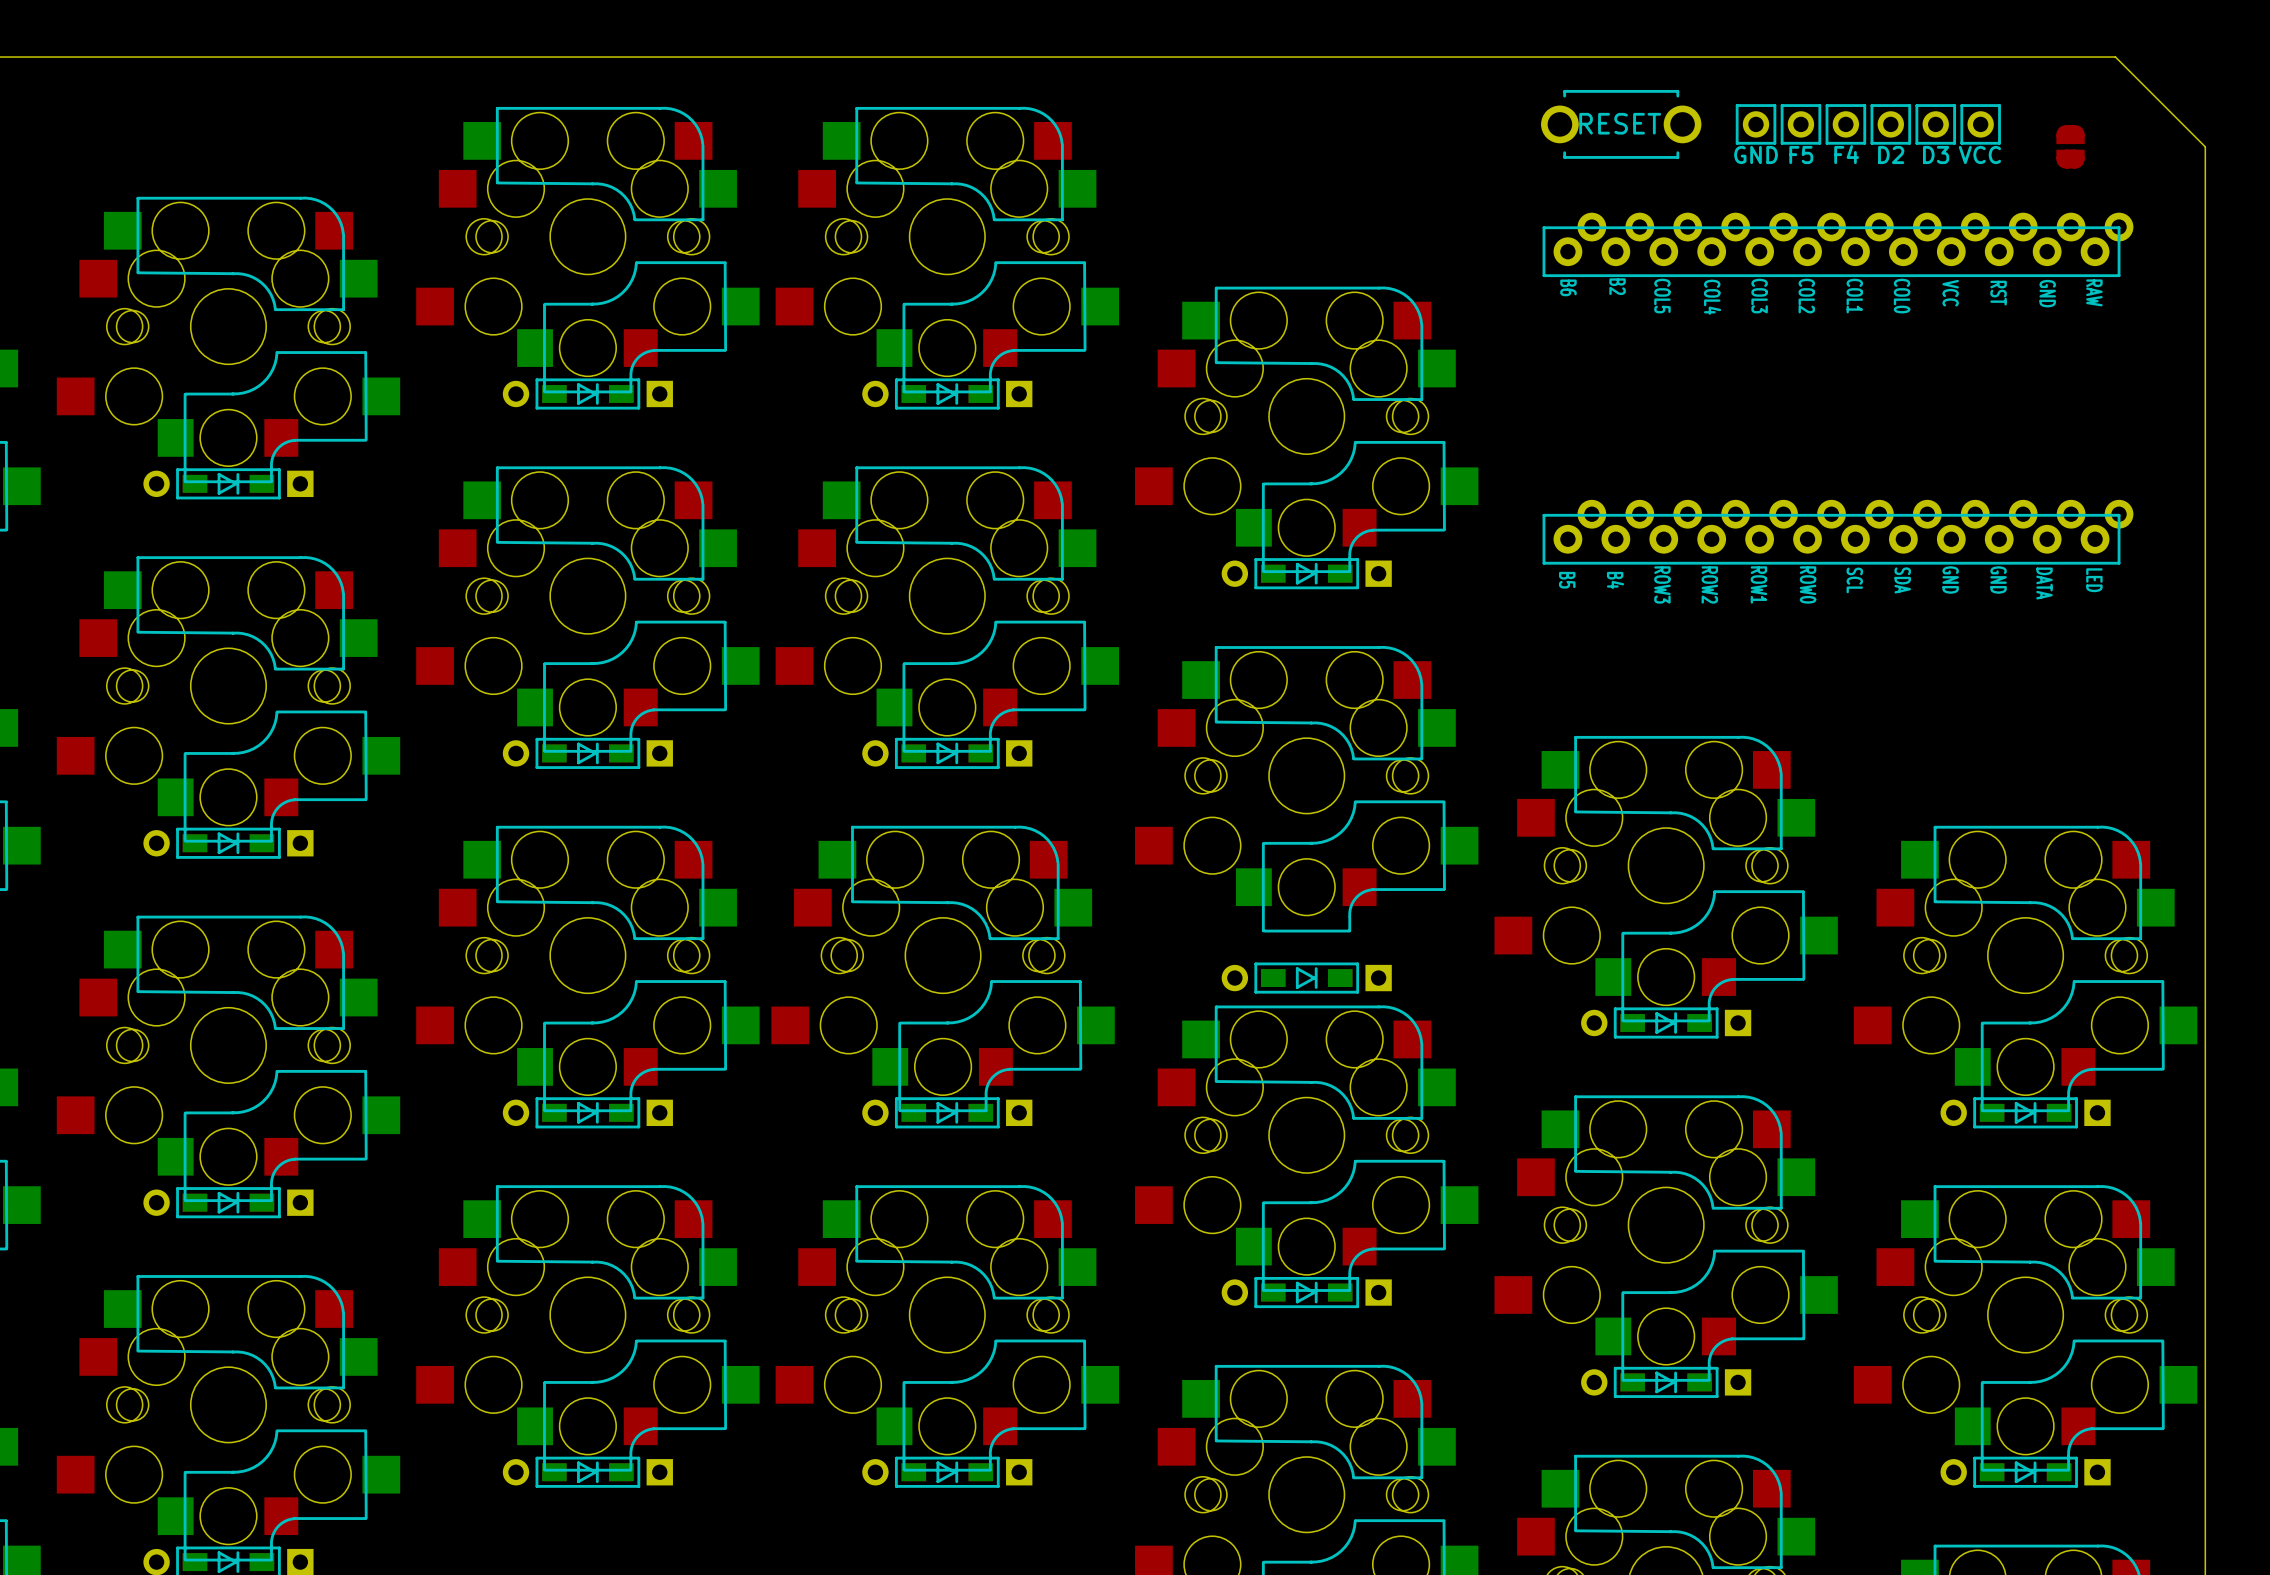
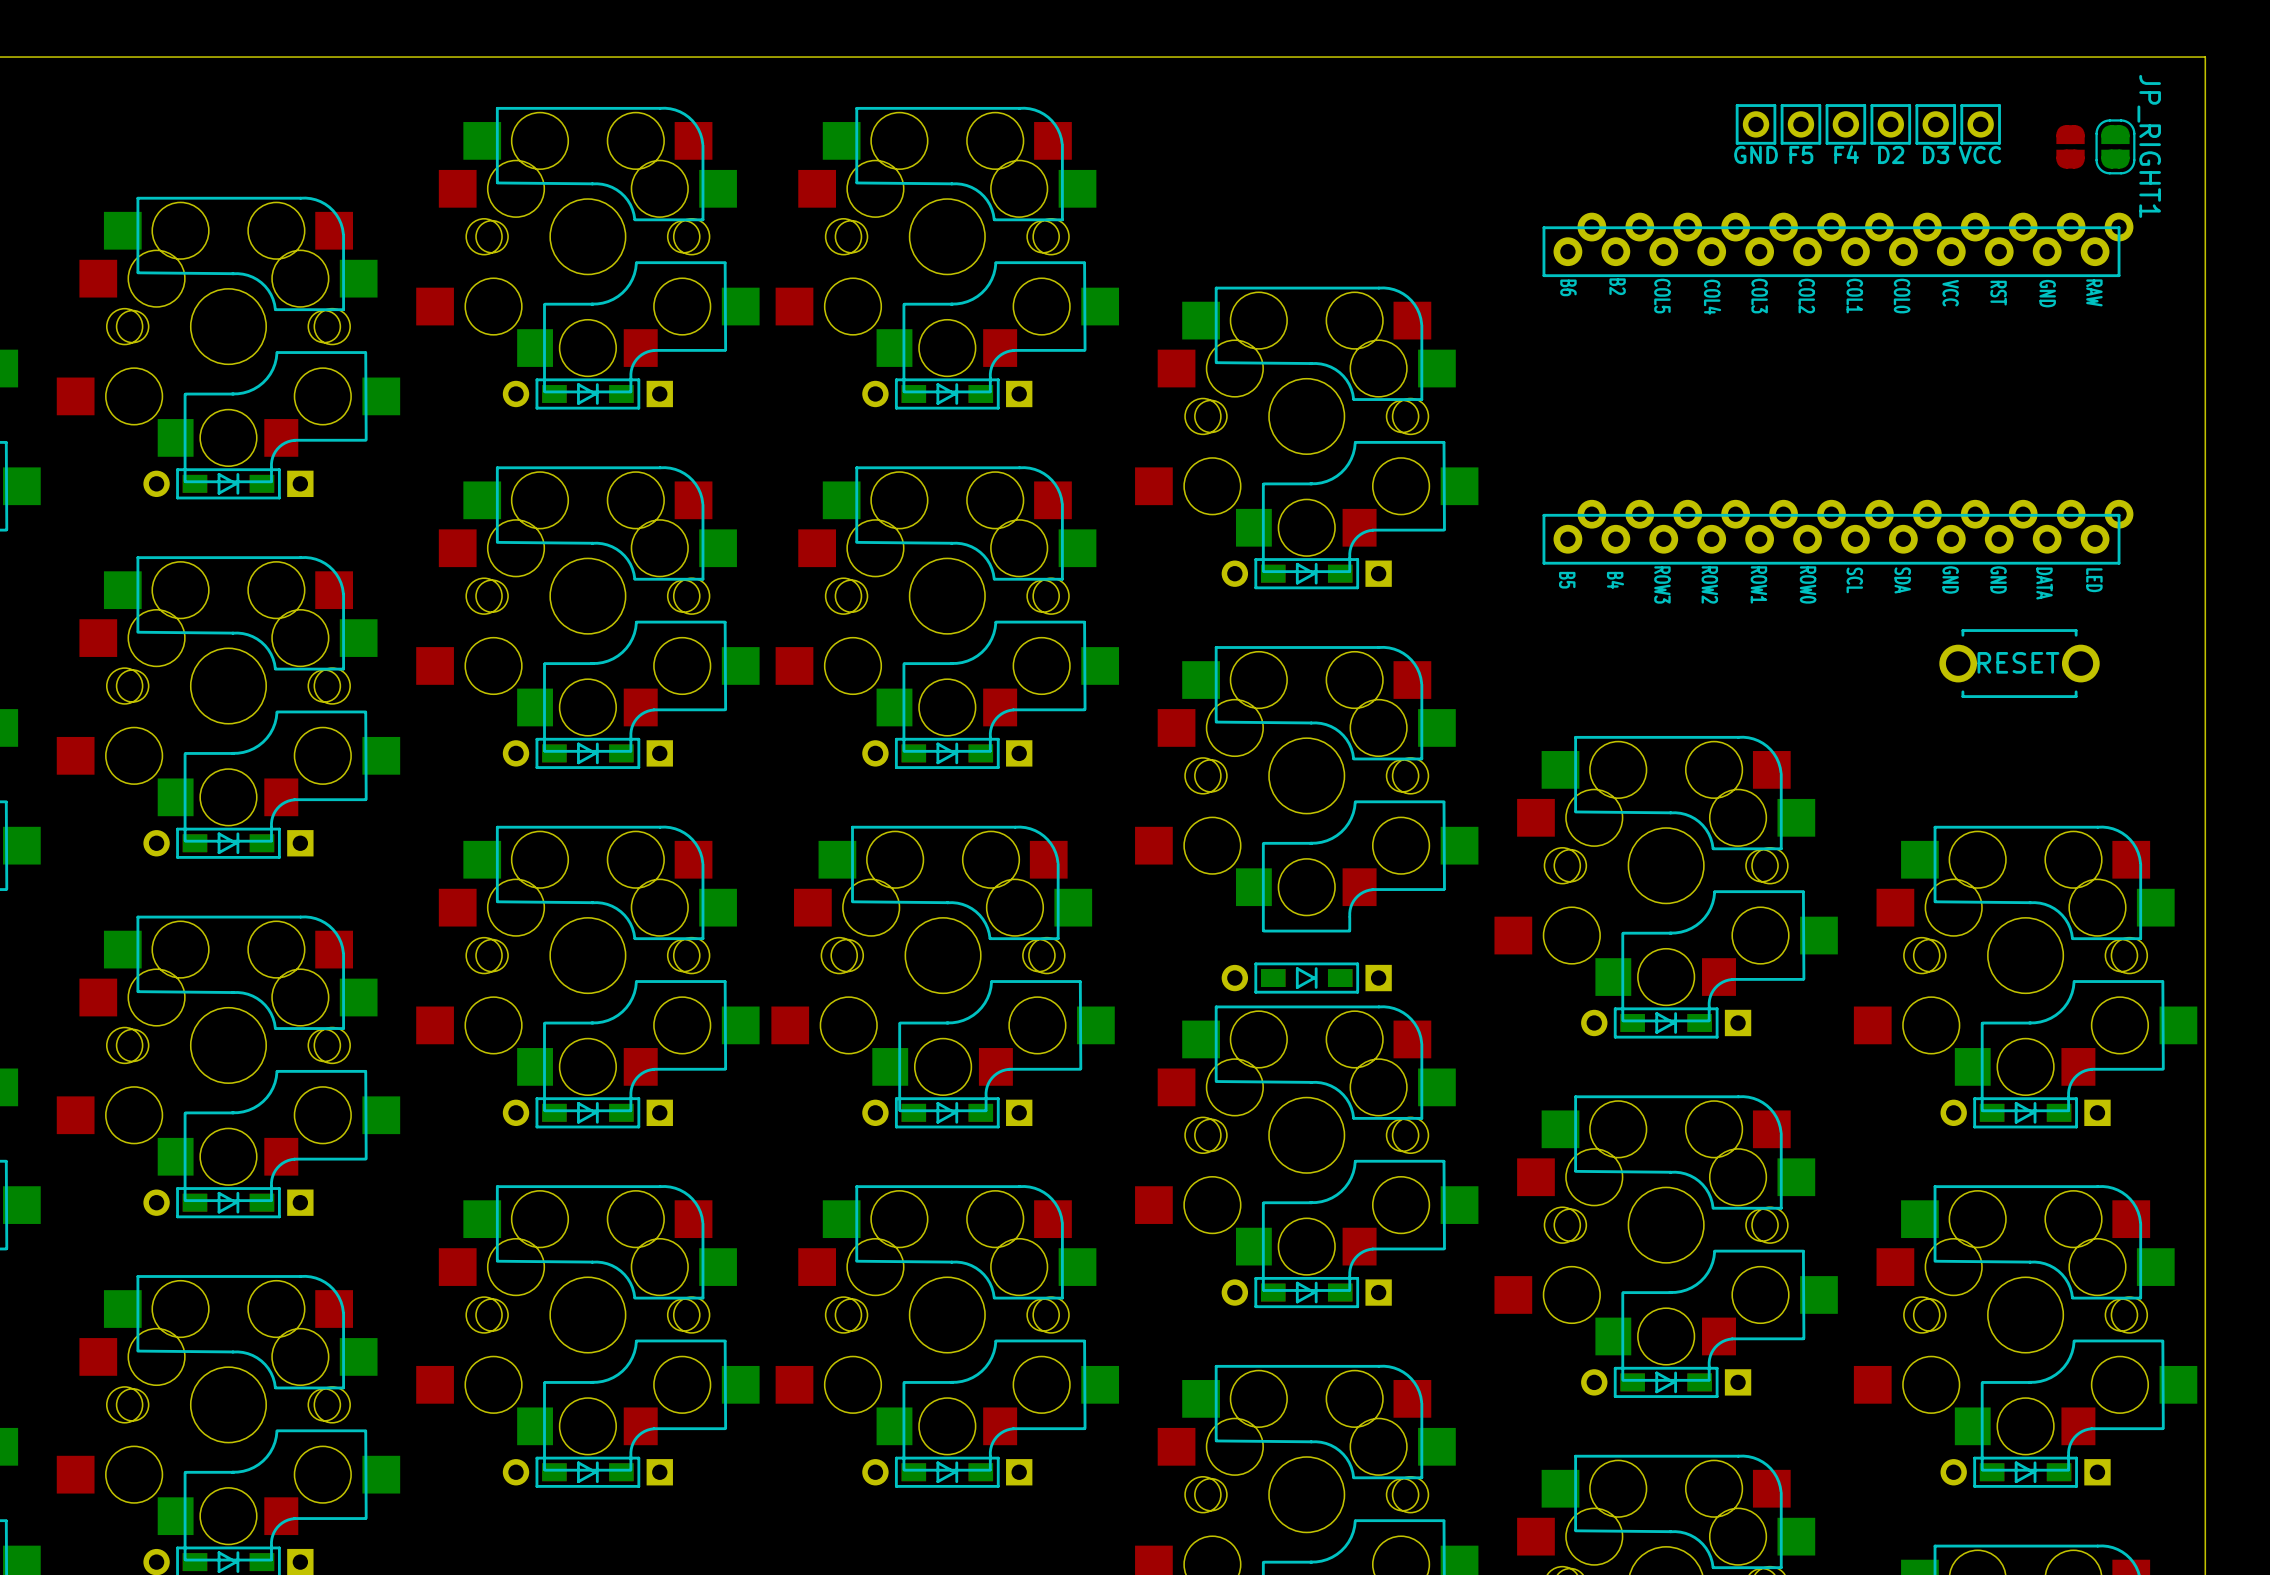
board edge: (2115, 57) (2205, 146) -> (2115, 57) (2205, 57) (2205, 146)
part: (1621, 124) -> none
JP_RIGHT1: none -> (2115, 146)
part: none -> (2019, 663)

